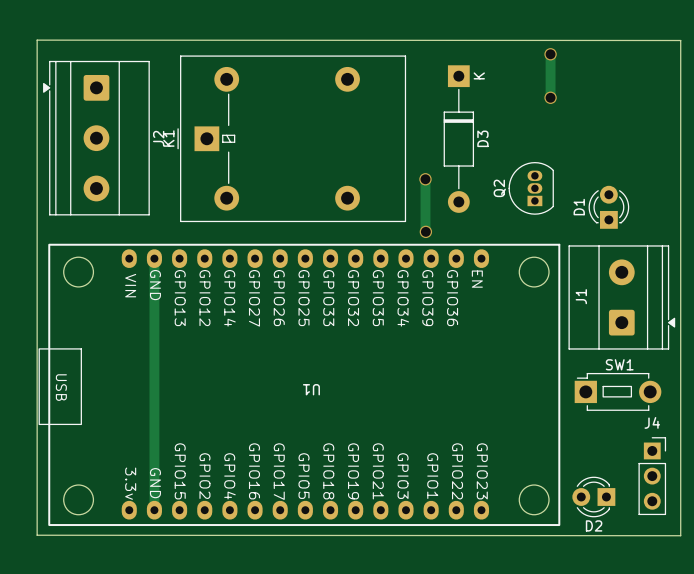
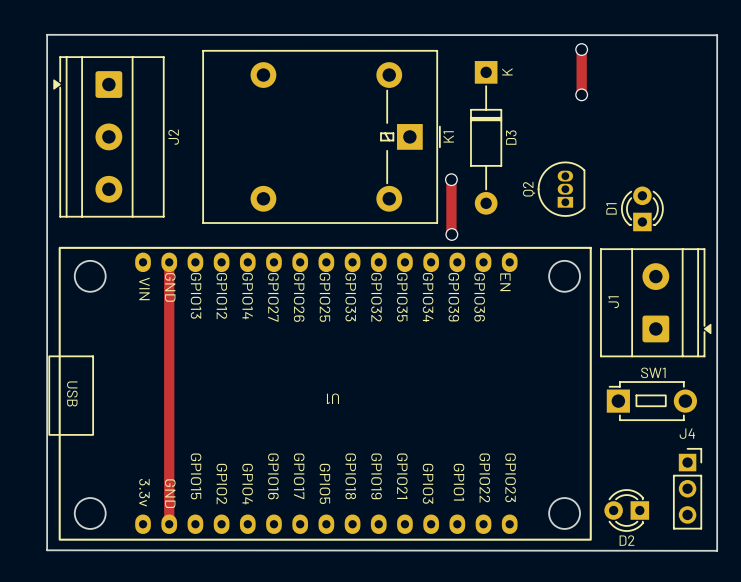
K1 rotation: 0° (291, 138) -> 180° (321, 136)

